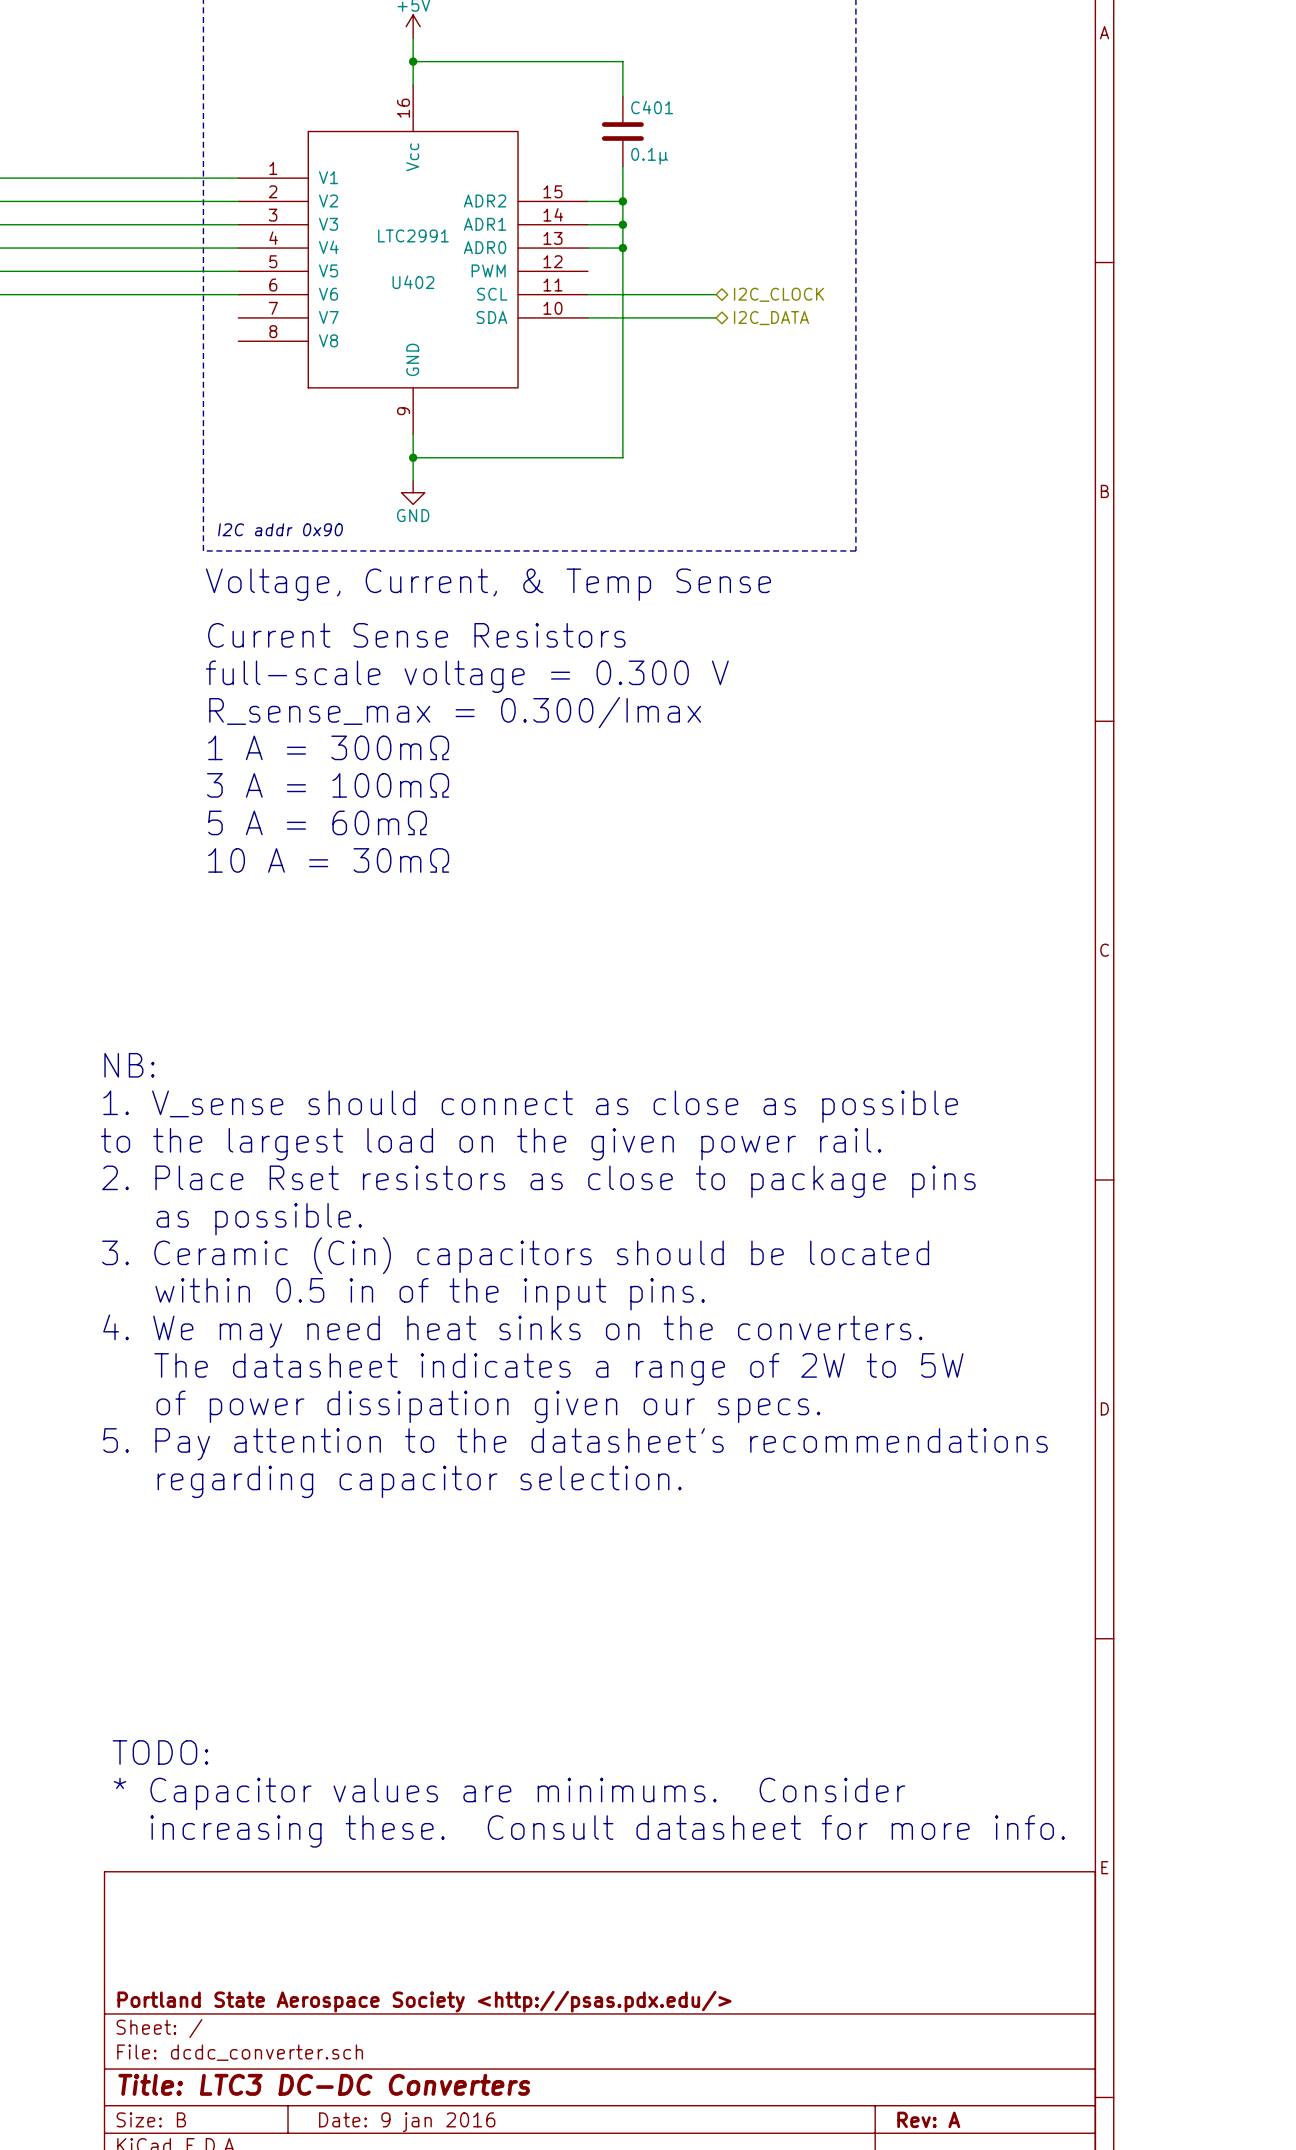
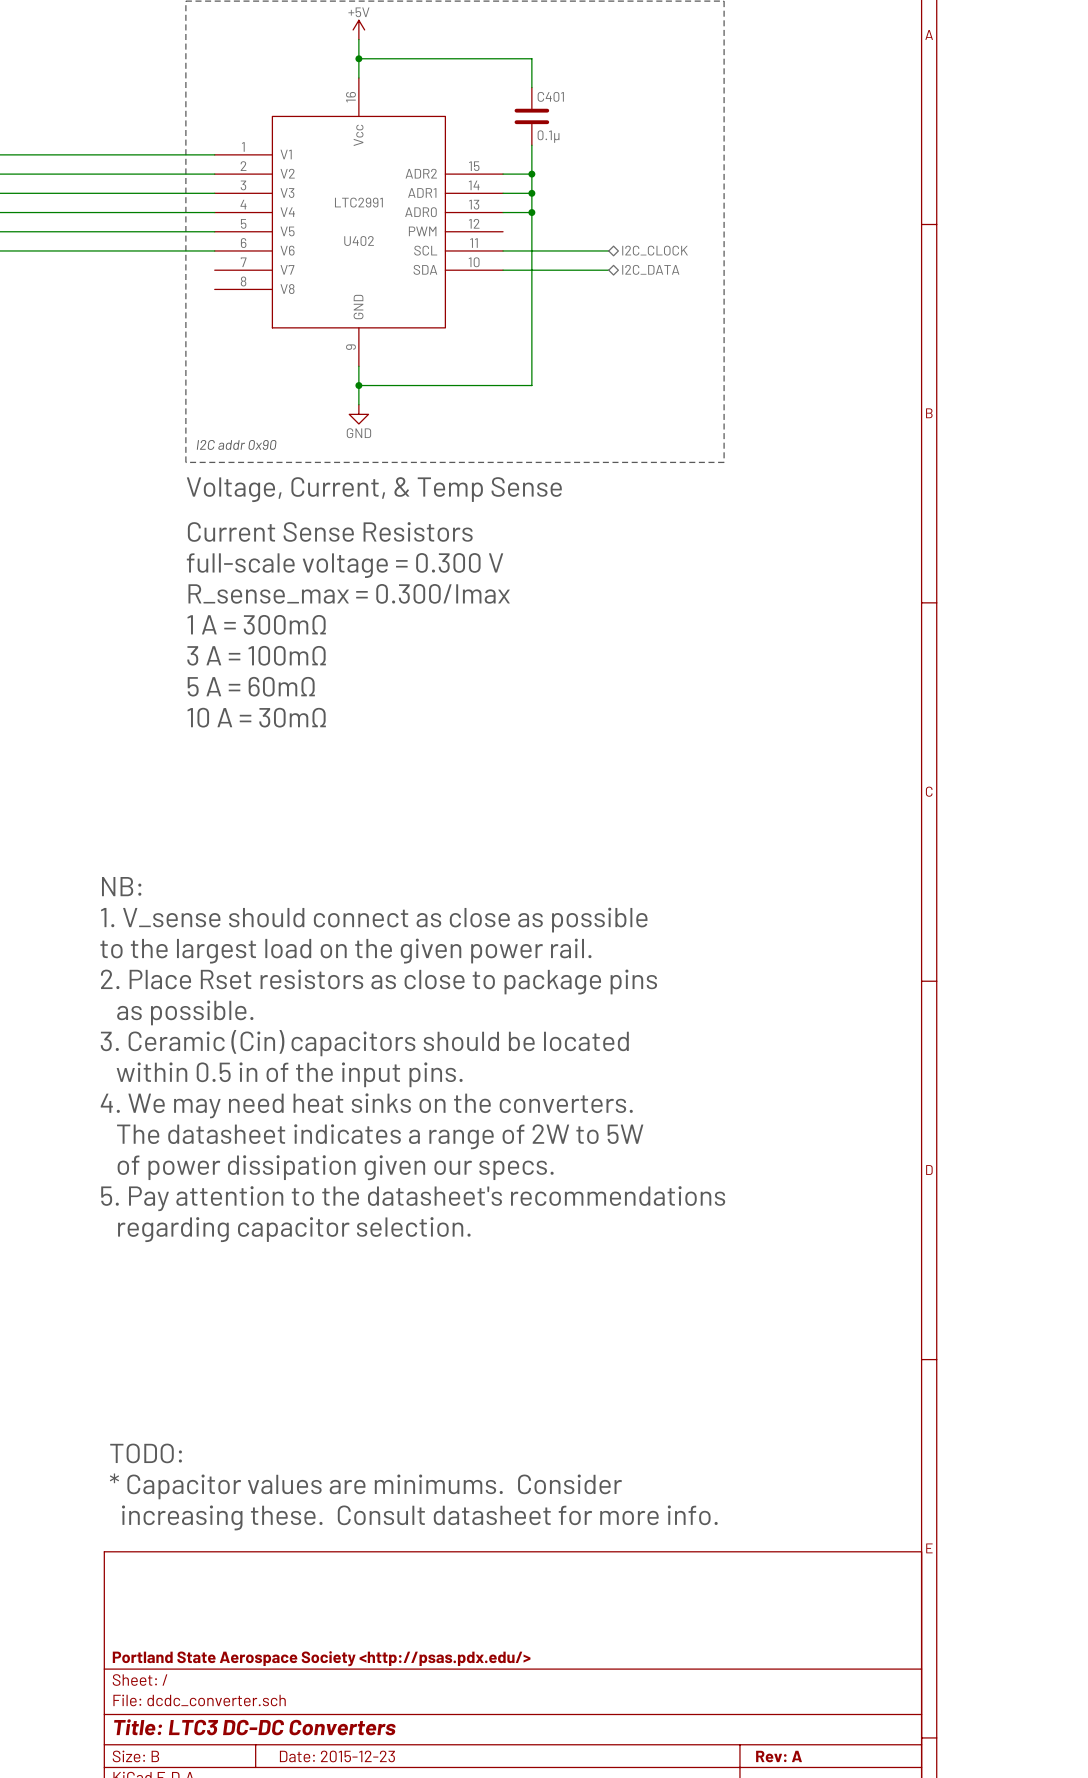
title block: Date: 9 jan 2016 (407, 2122) -> Date: 2015-12-23 (337, 1756)

